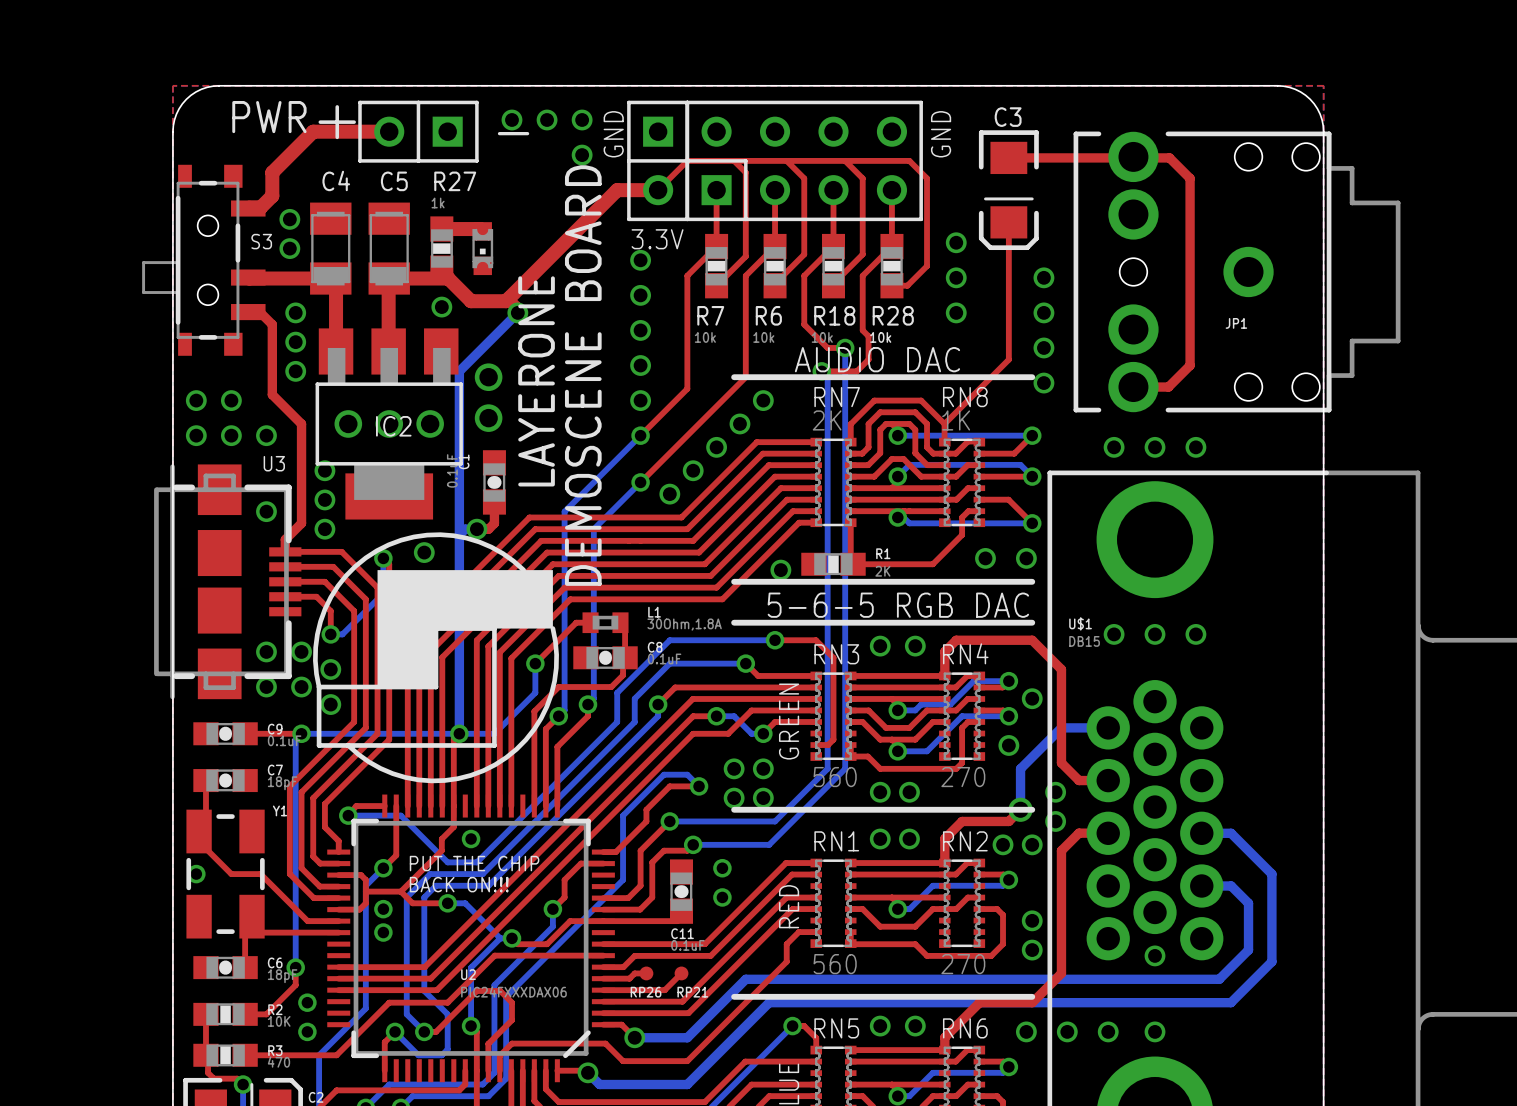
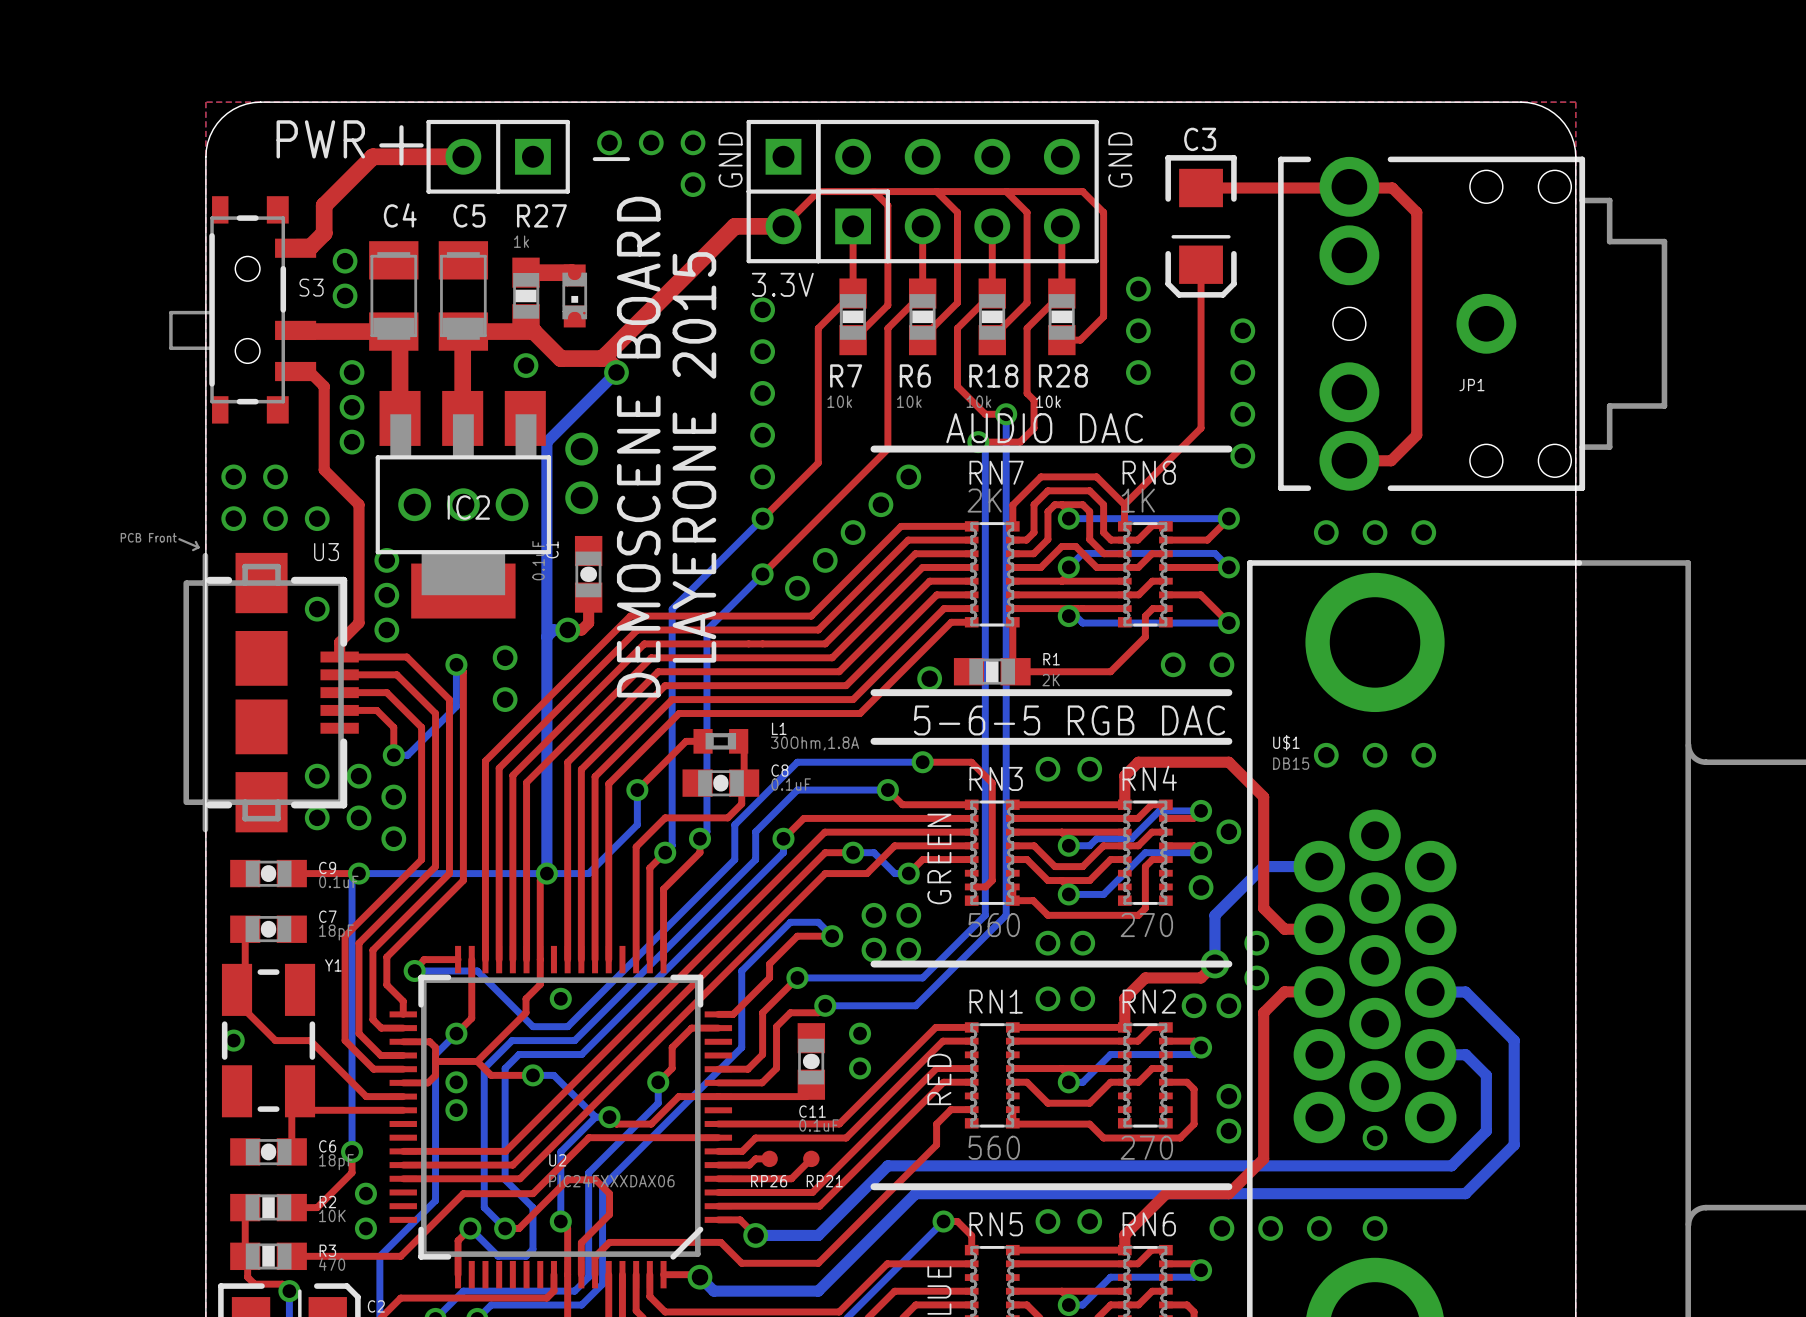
text position: DEMOSCENE BOARD (583, 375) -> DEMOSCENE BOARD (638, 447)
text: LAYERONE (536, 381) -> LAYERONE 2015 (694, 457)
U3 footprint: [154, 464, 302, 700] -> [178, 538, 359, 833]
drawing: [313, 532, 559, 784] -> none
text: PUT THE CHIP (474, 863) -> none
text: BACK ON!!! (459, 884) -> none

